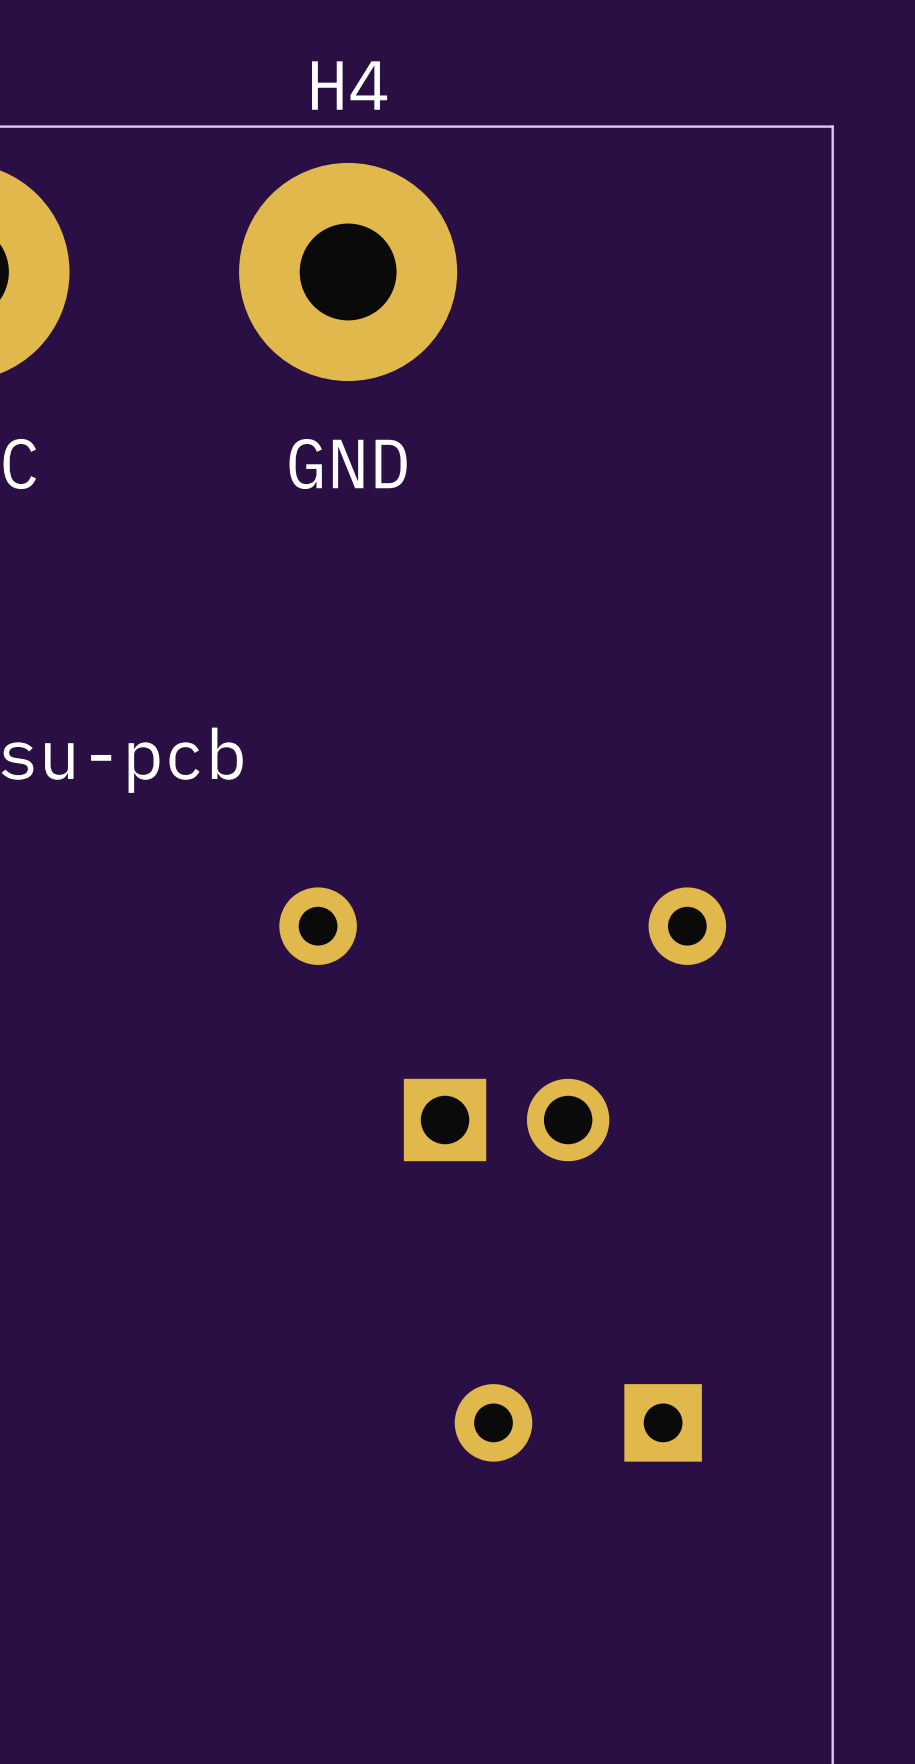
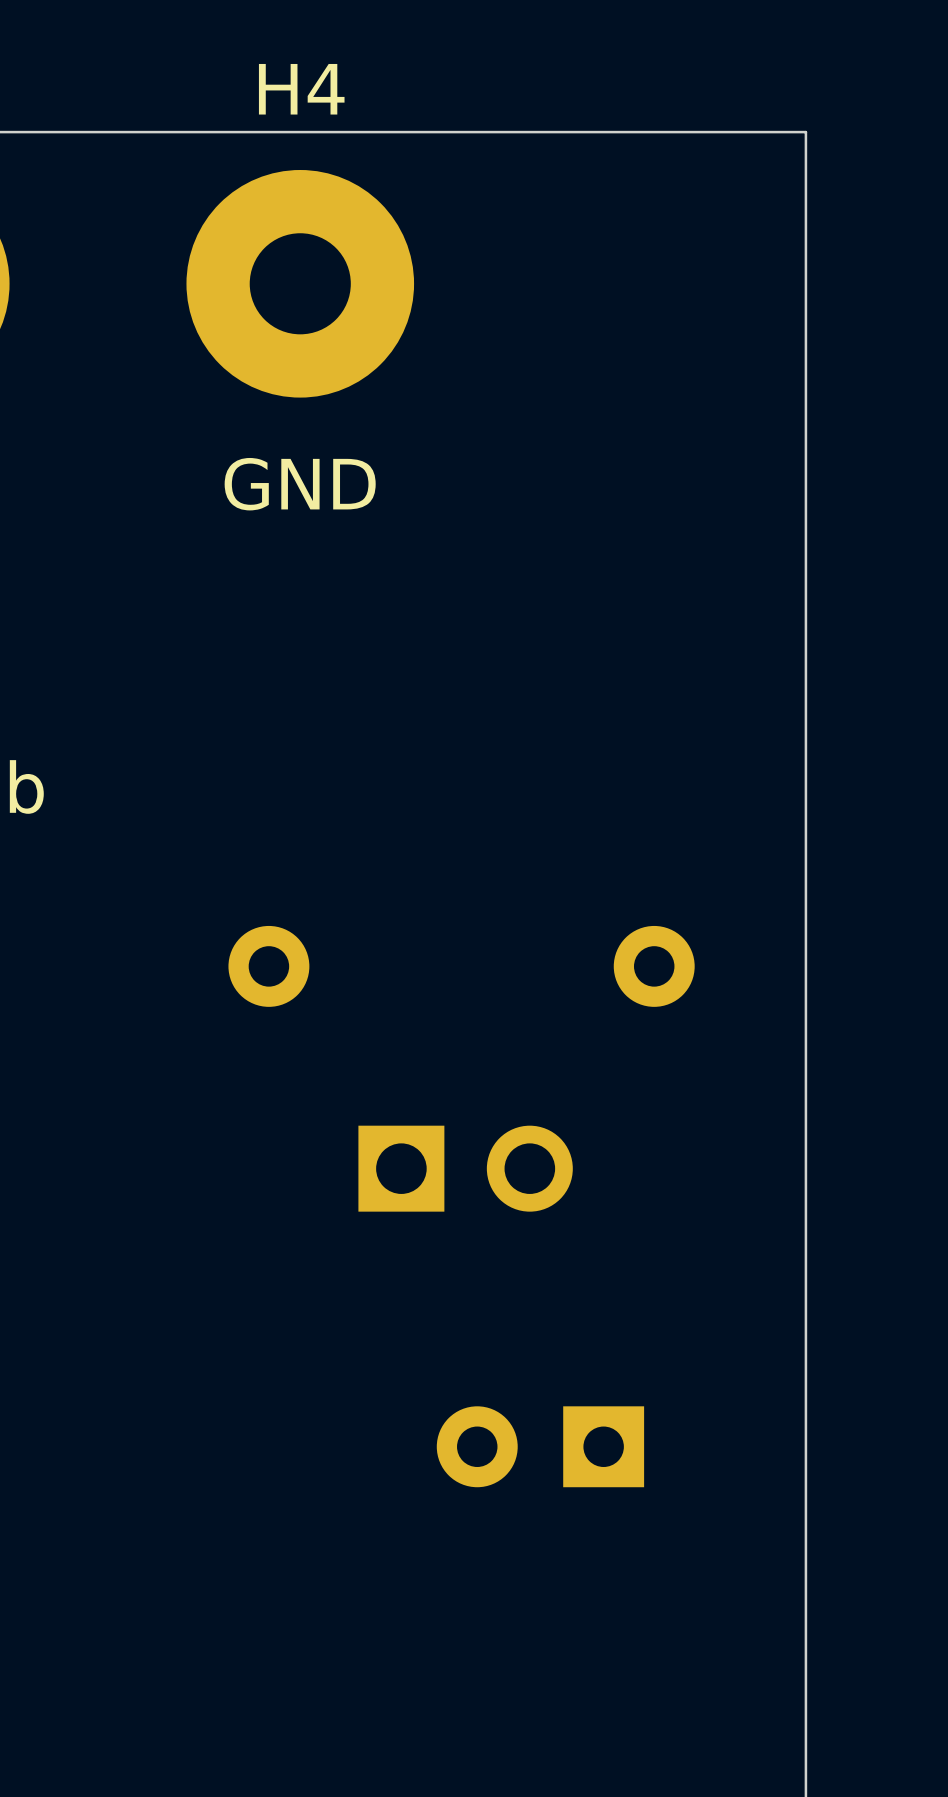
part footprint: [454, 1384, 702, 1462] -> [436, 1406, 645, 1488]

